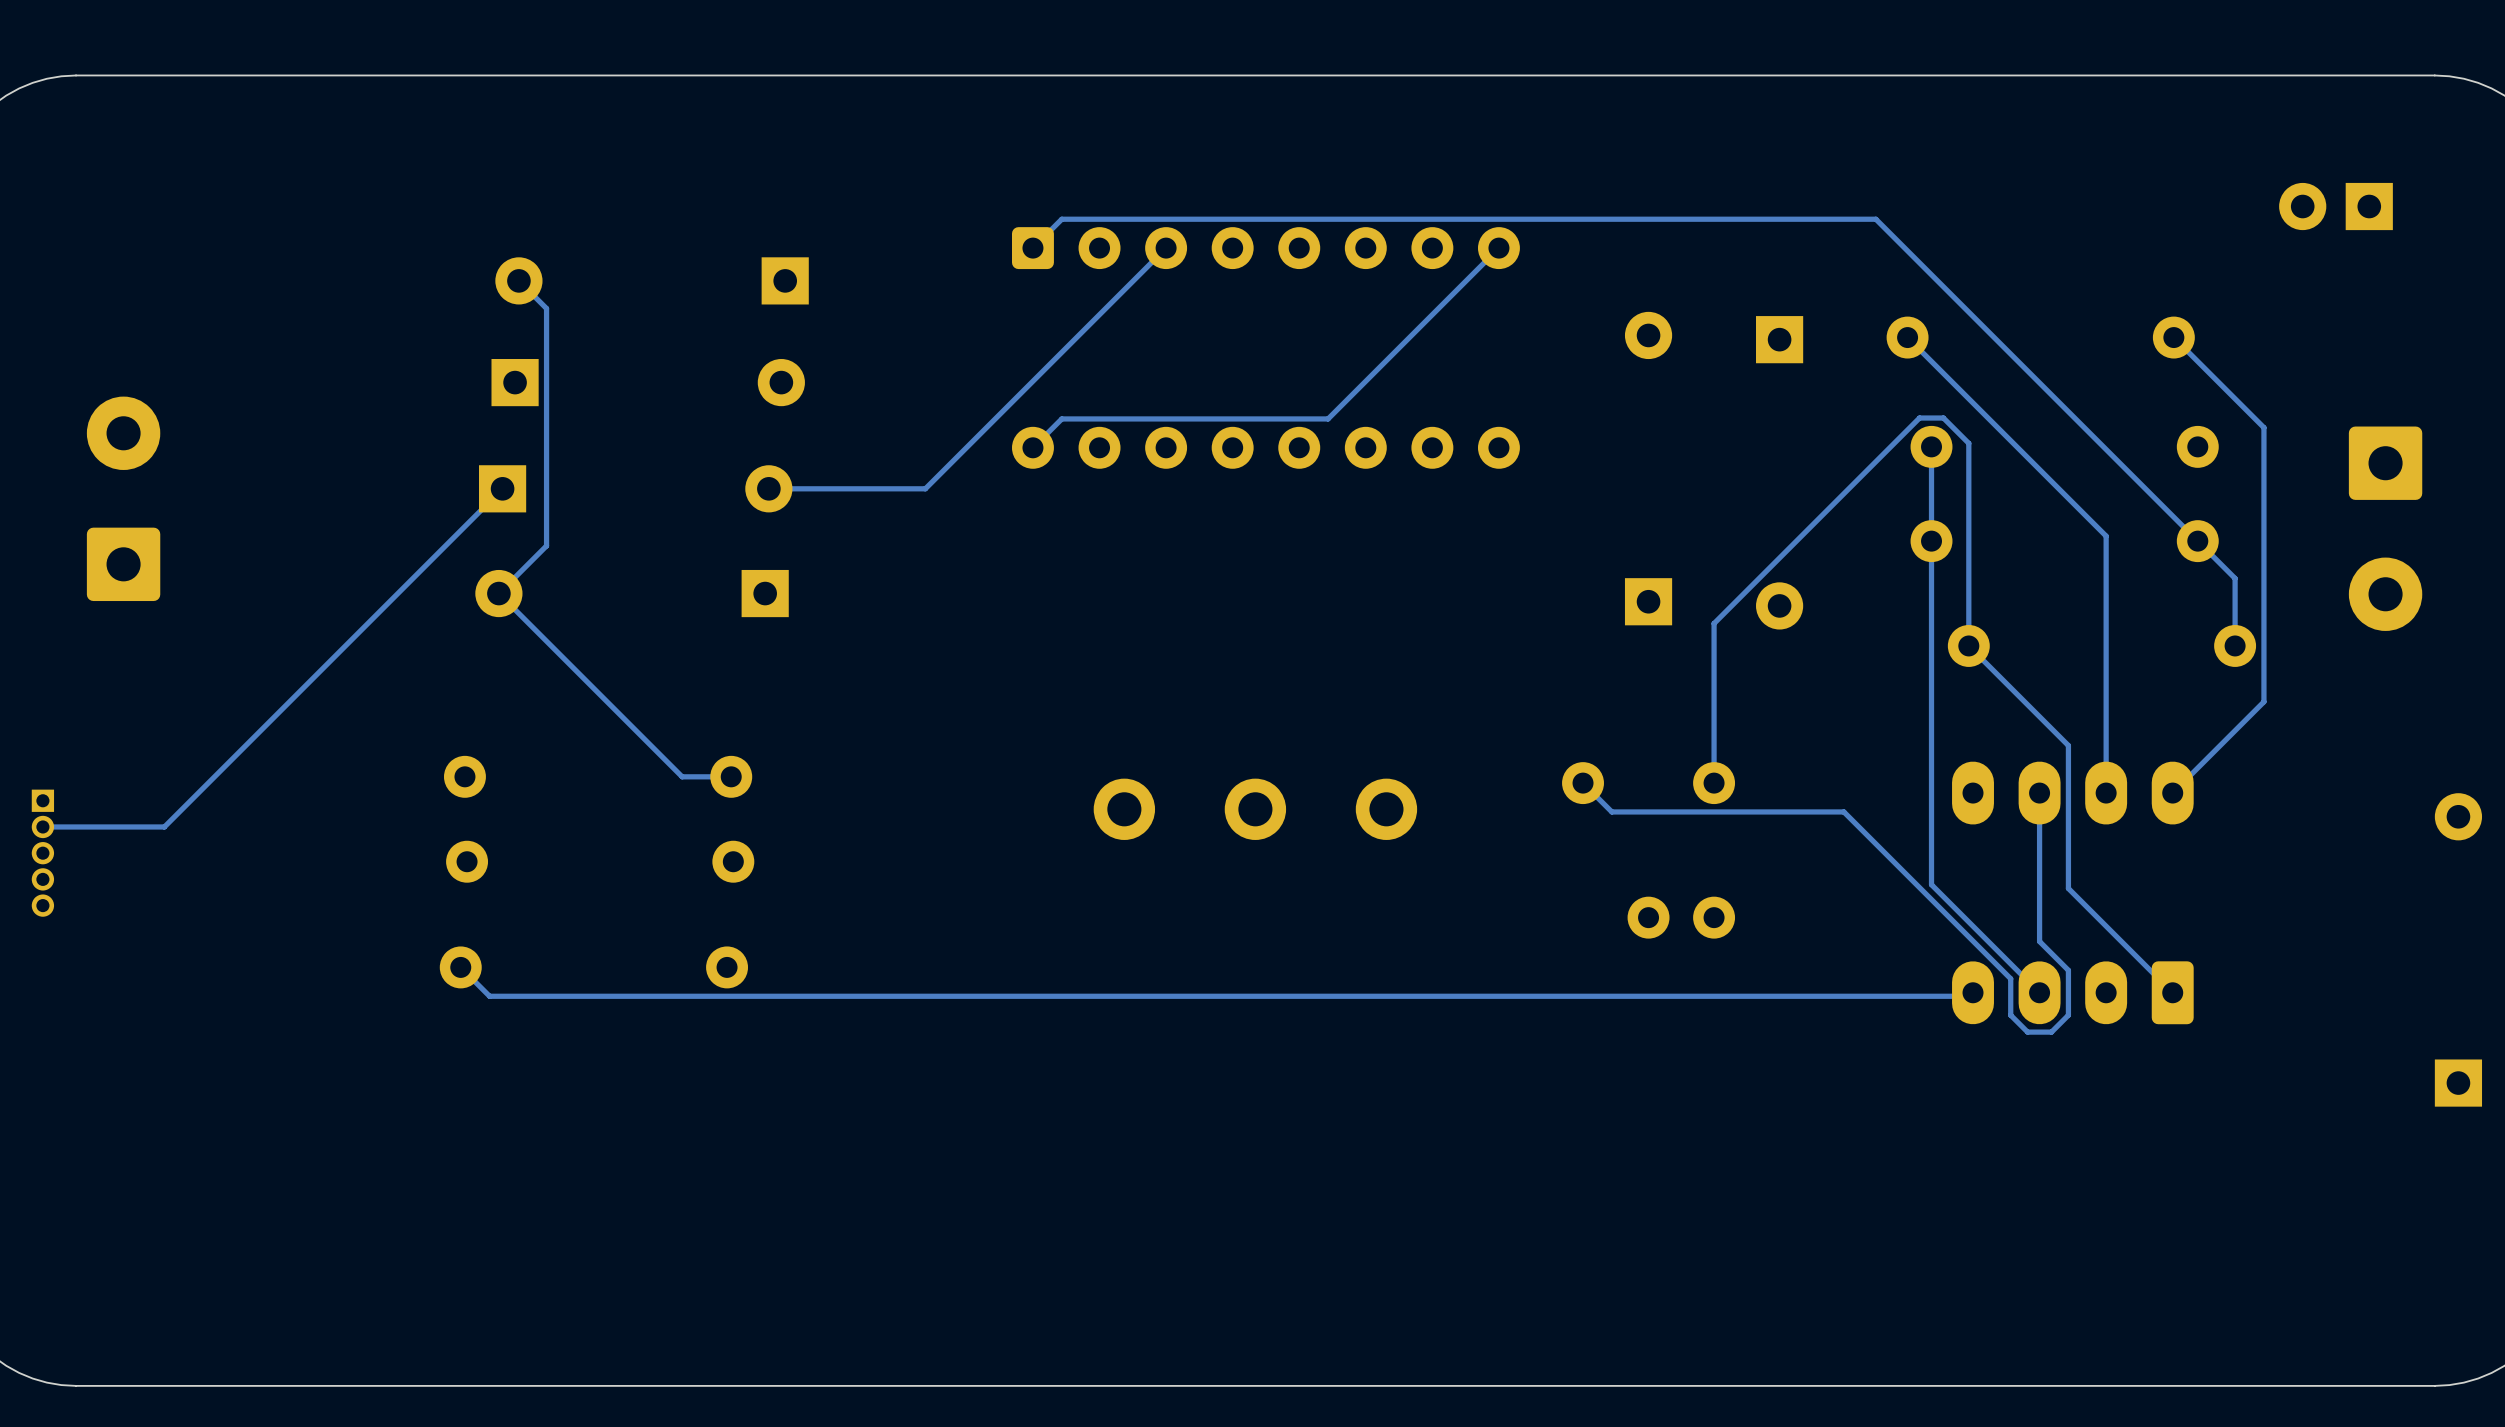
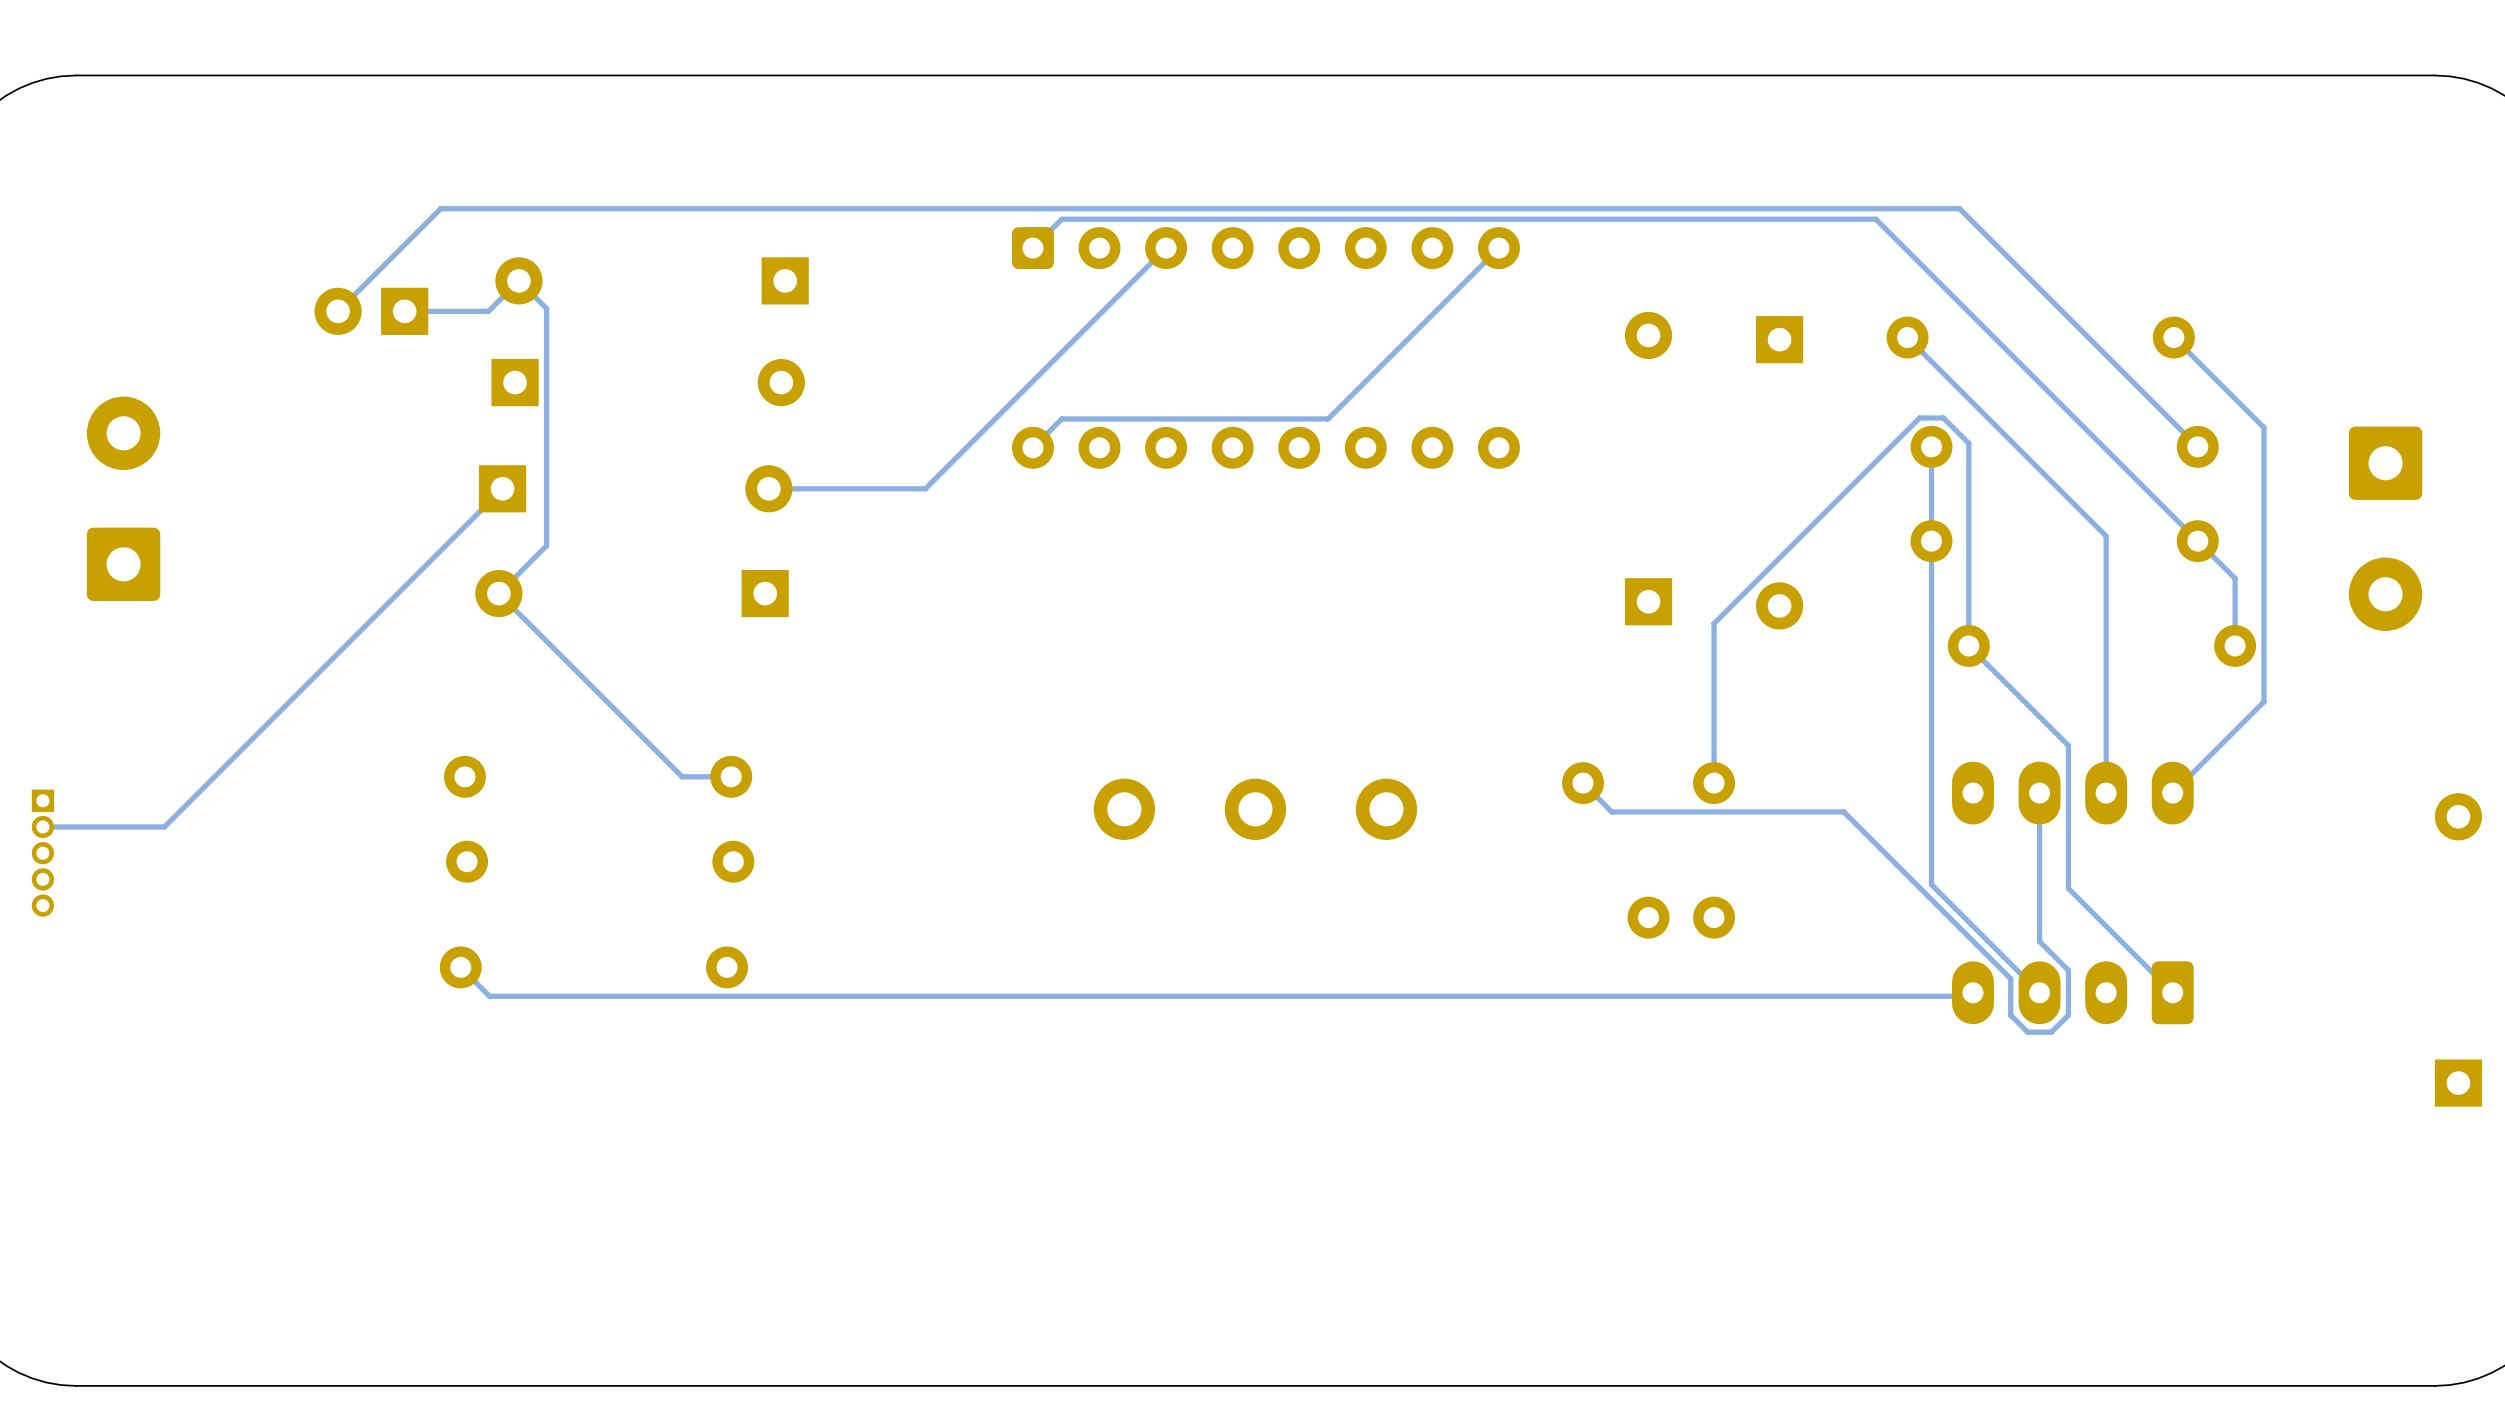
part: (2336, 206) -> none
track: none -> (518, 280) (488, 311) (404, 311)
track: none -> (338, 311) (440, 208) (1959, 208) (2197, 446)
part: none -> (371, 311)

